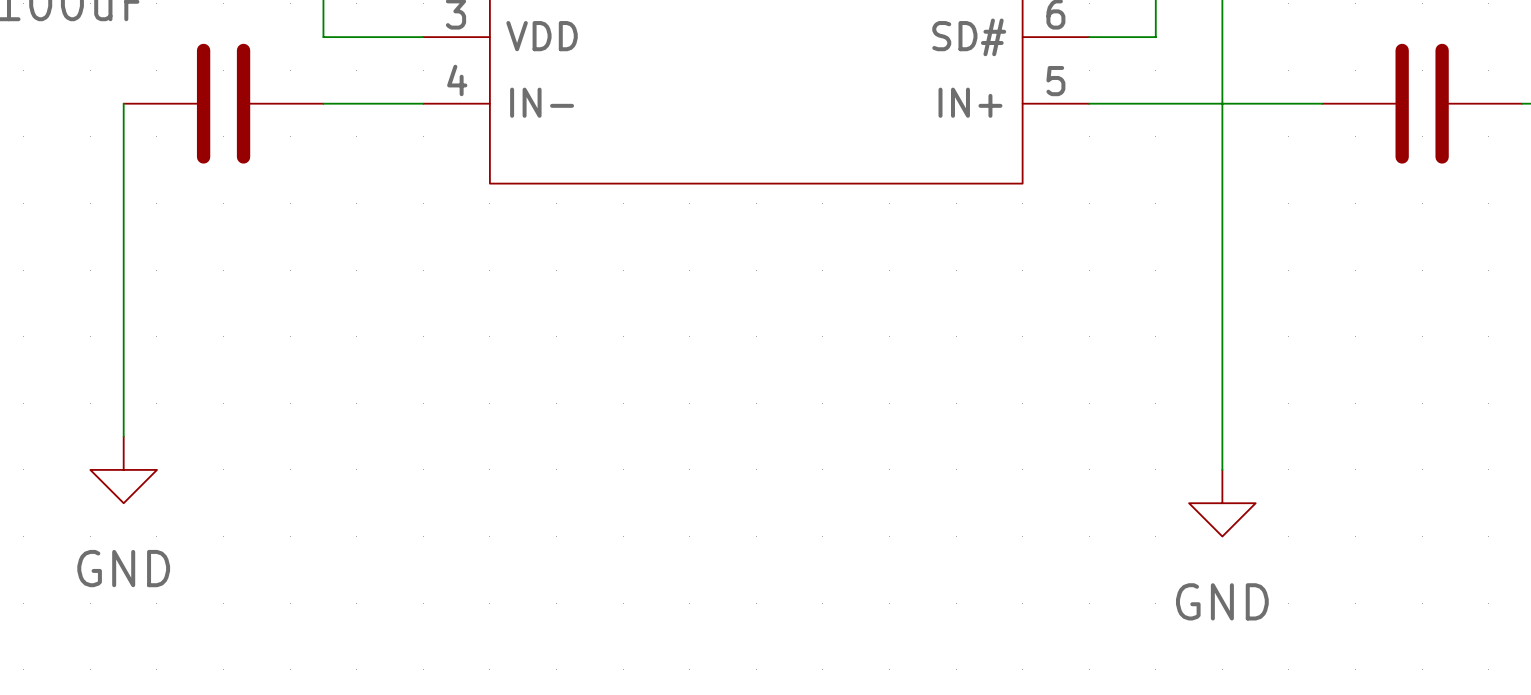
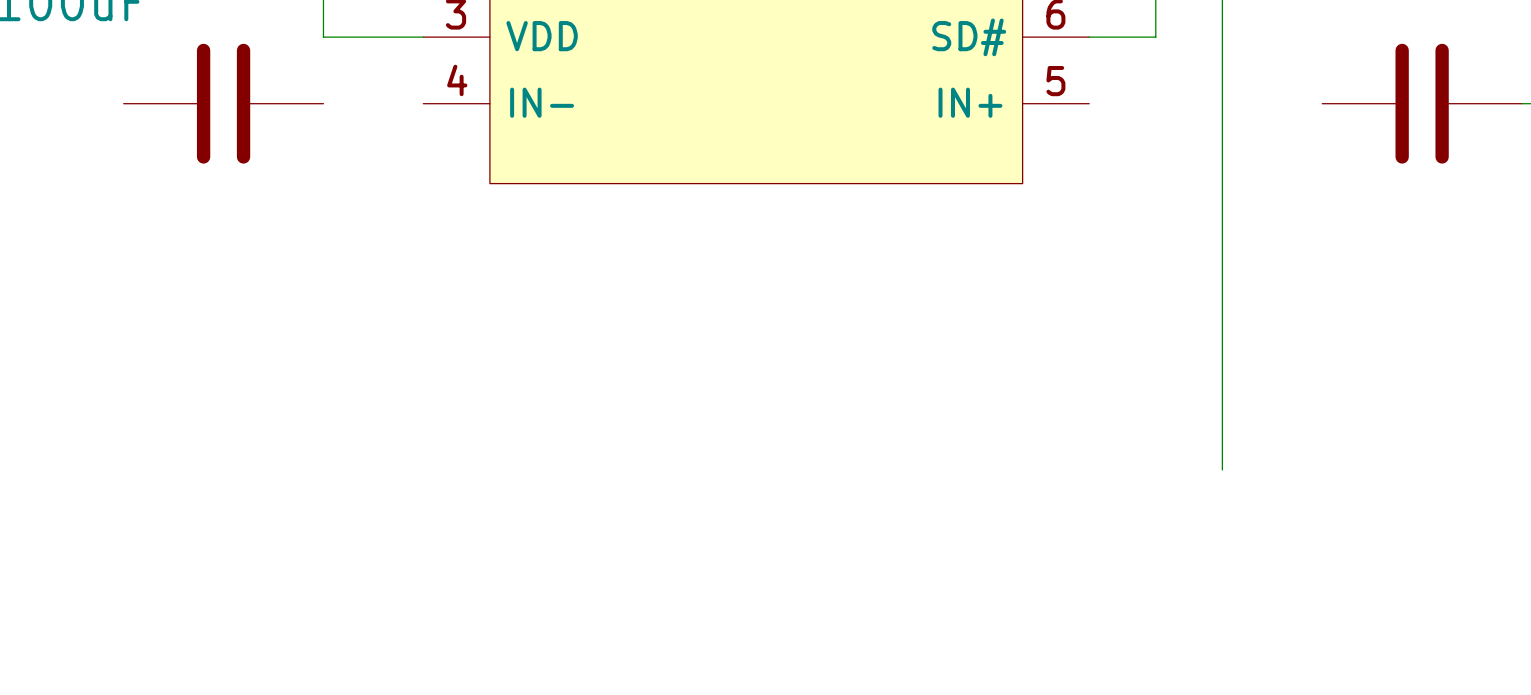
wire: (123, 103) (123, 436) -> none
wire: (323, 103) (423, 103) -> none
wire: (1089, 103) (1322, 103) -> none
power symbol: GND (123, 469) -> none
power symbol: GND (1222, 503) -> none

